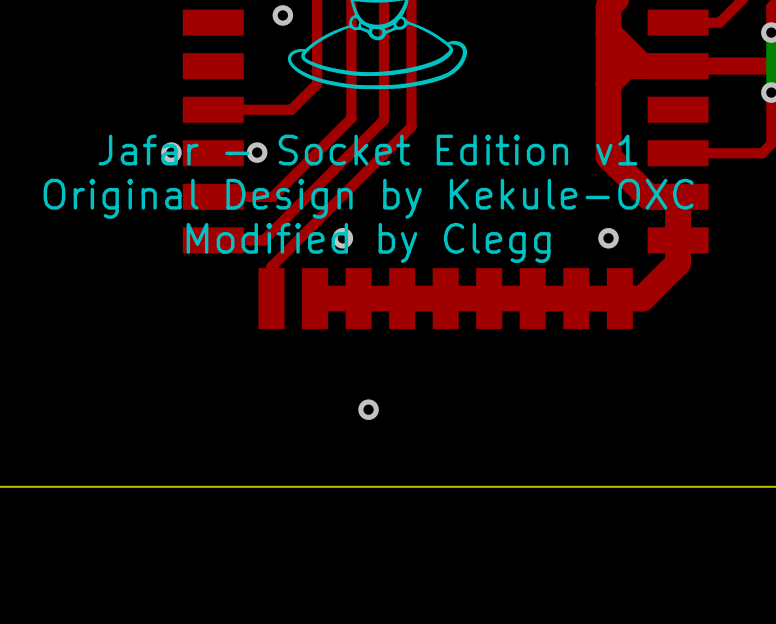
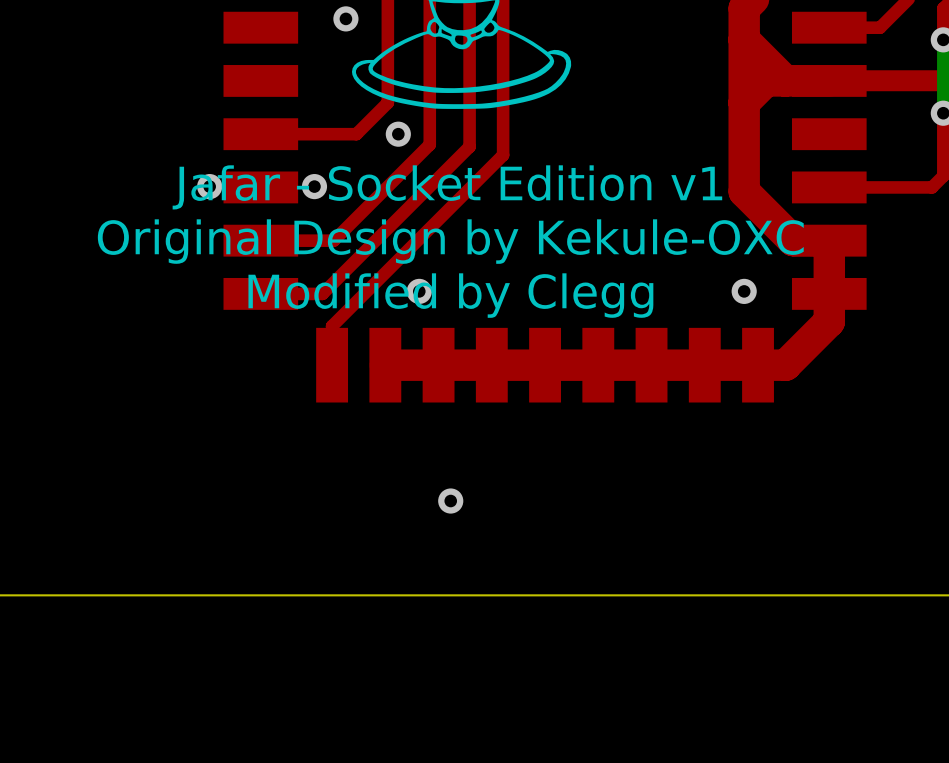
via: none -> (398, 134)

